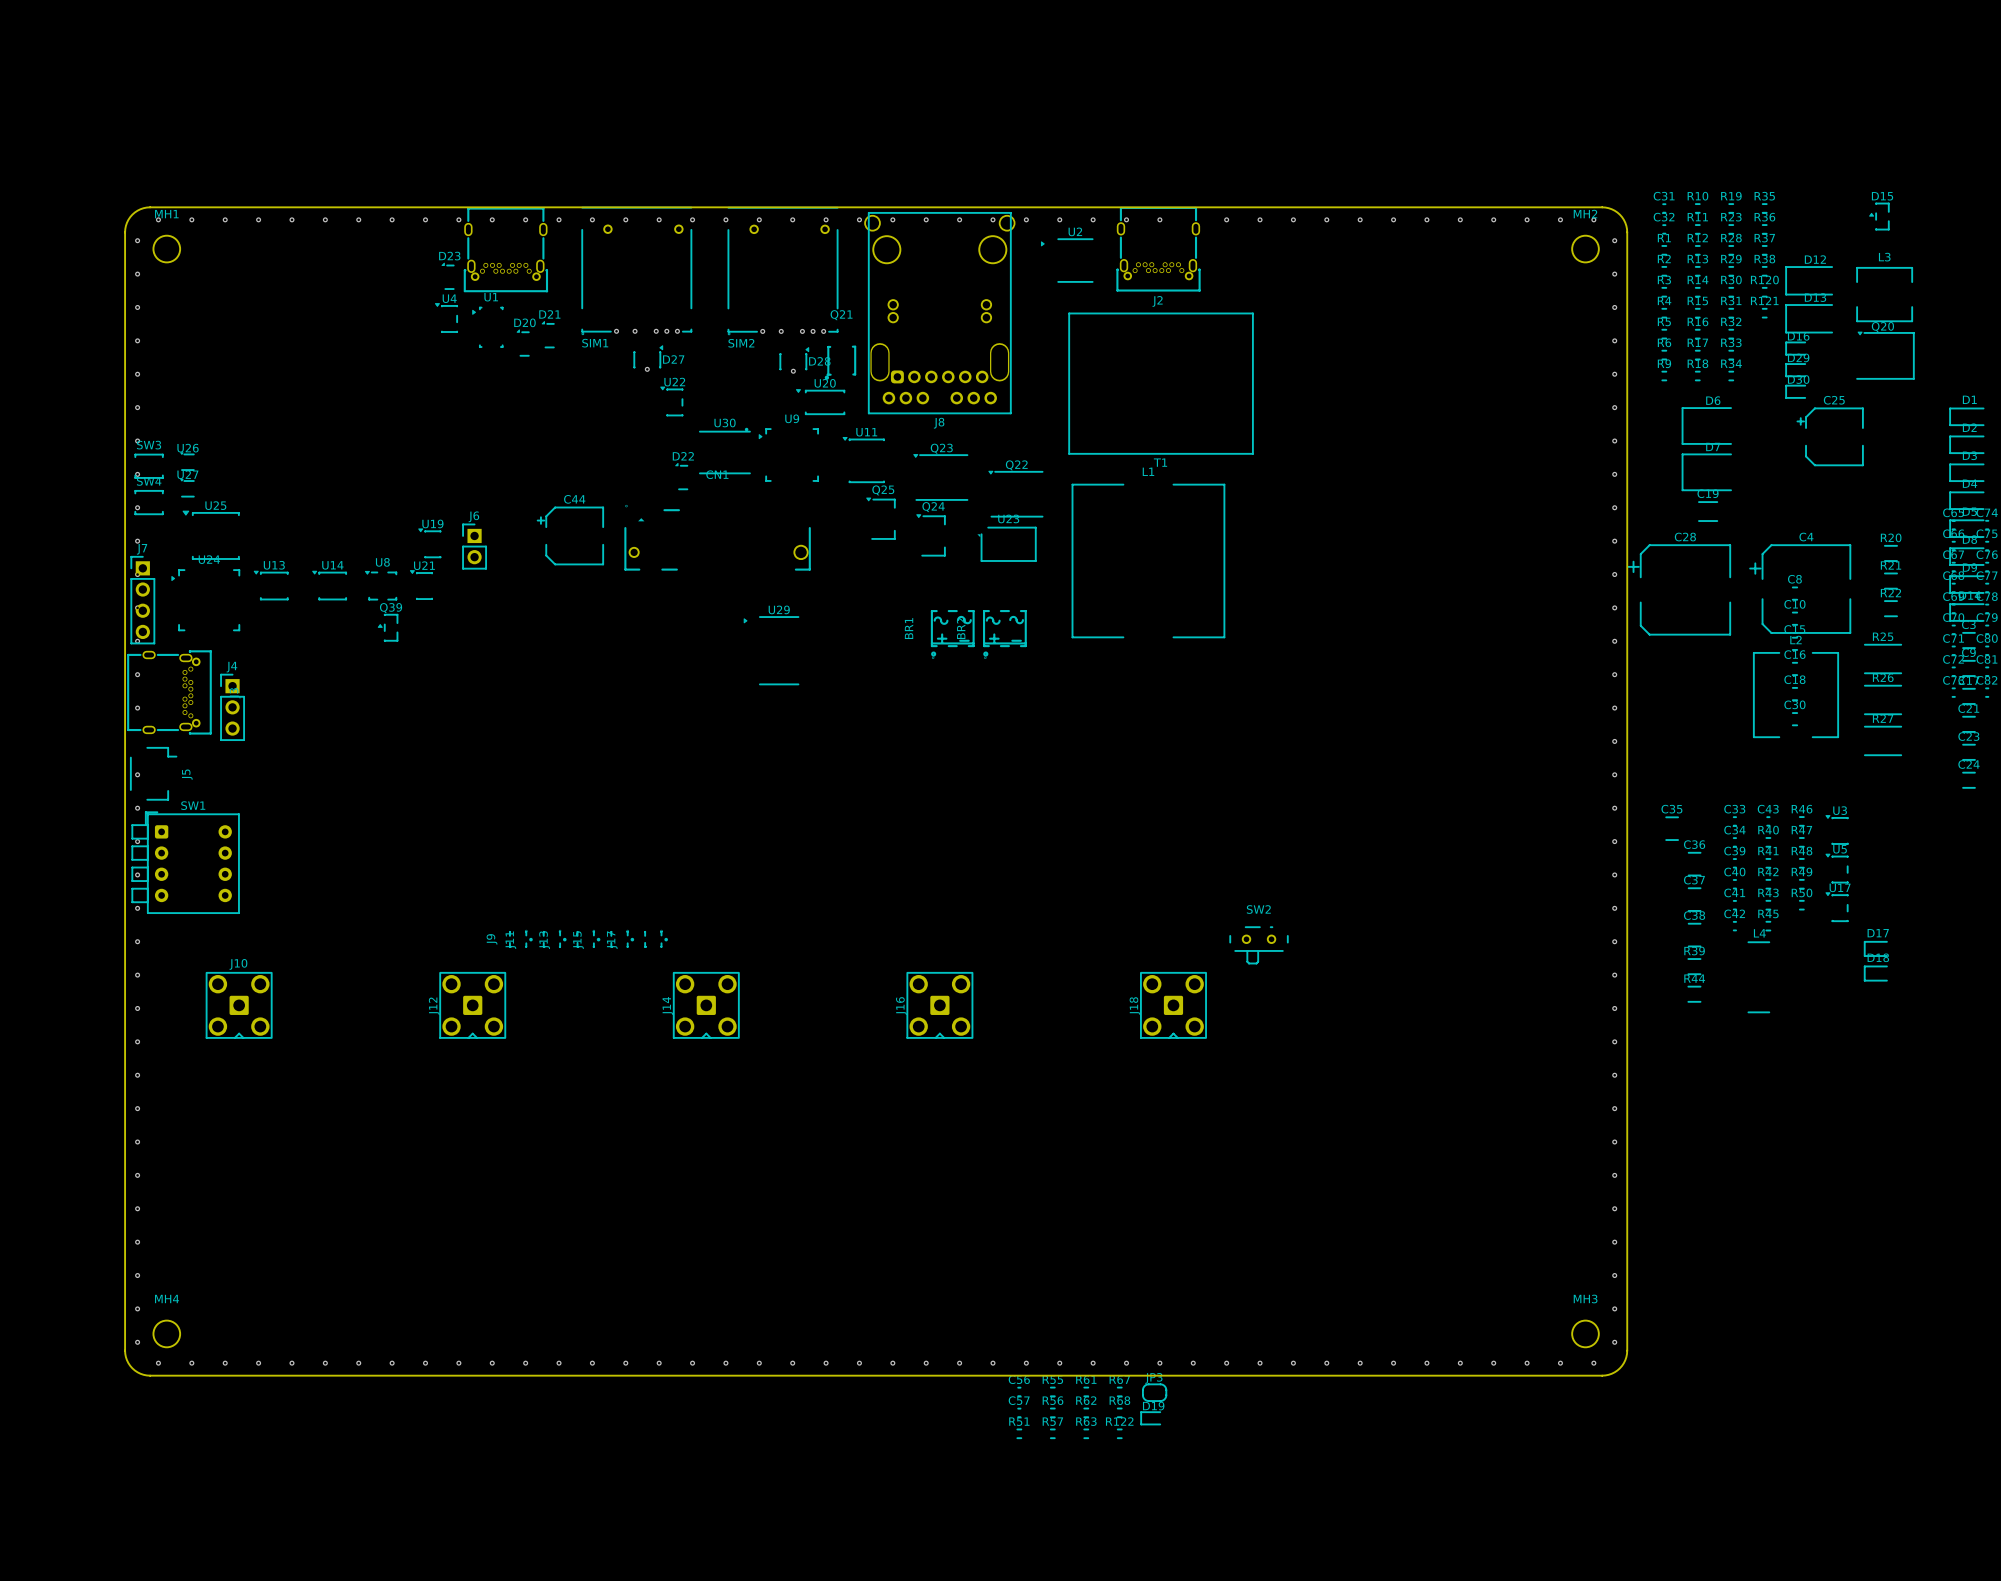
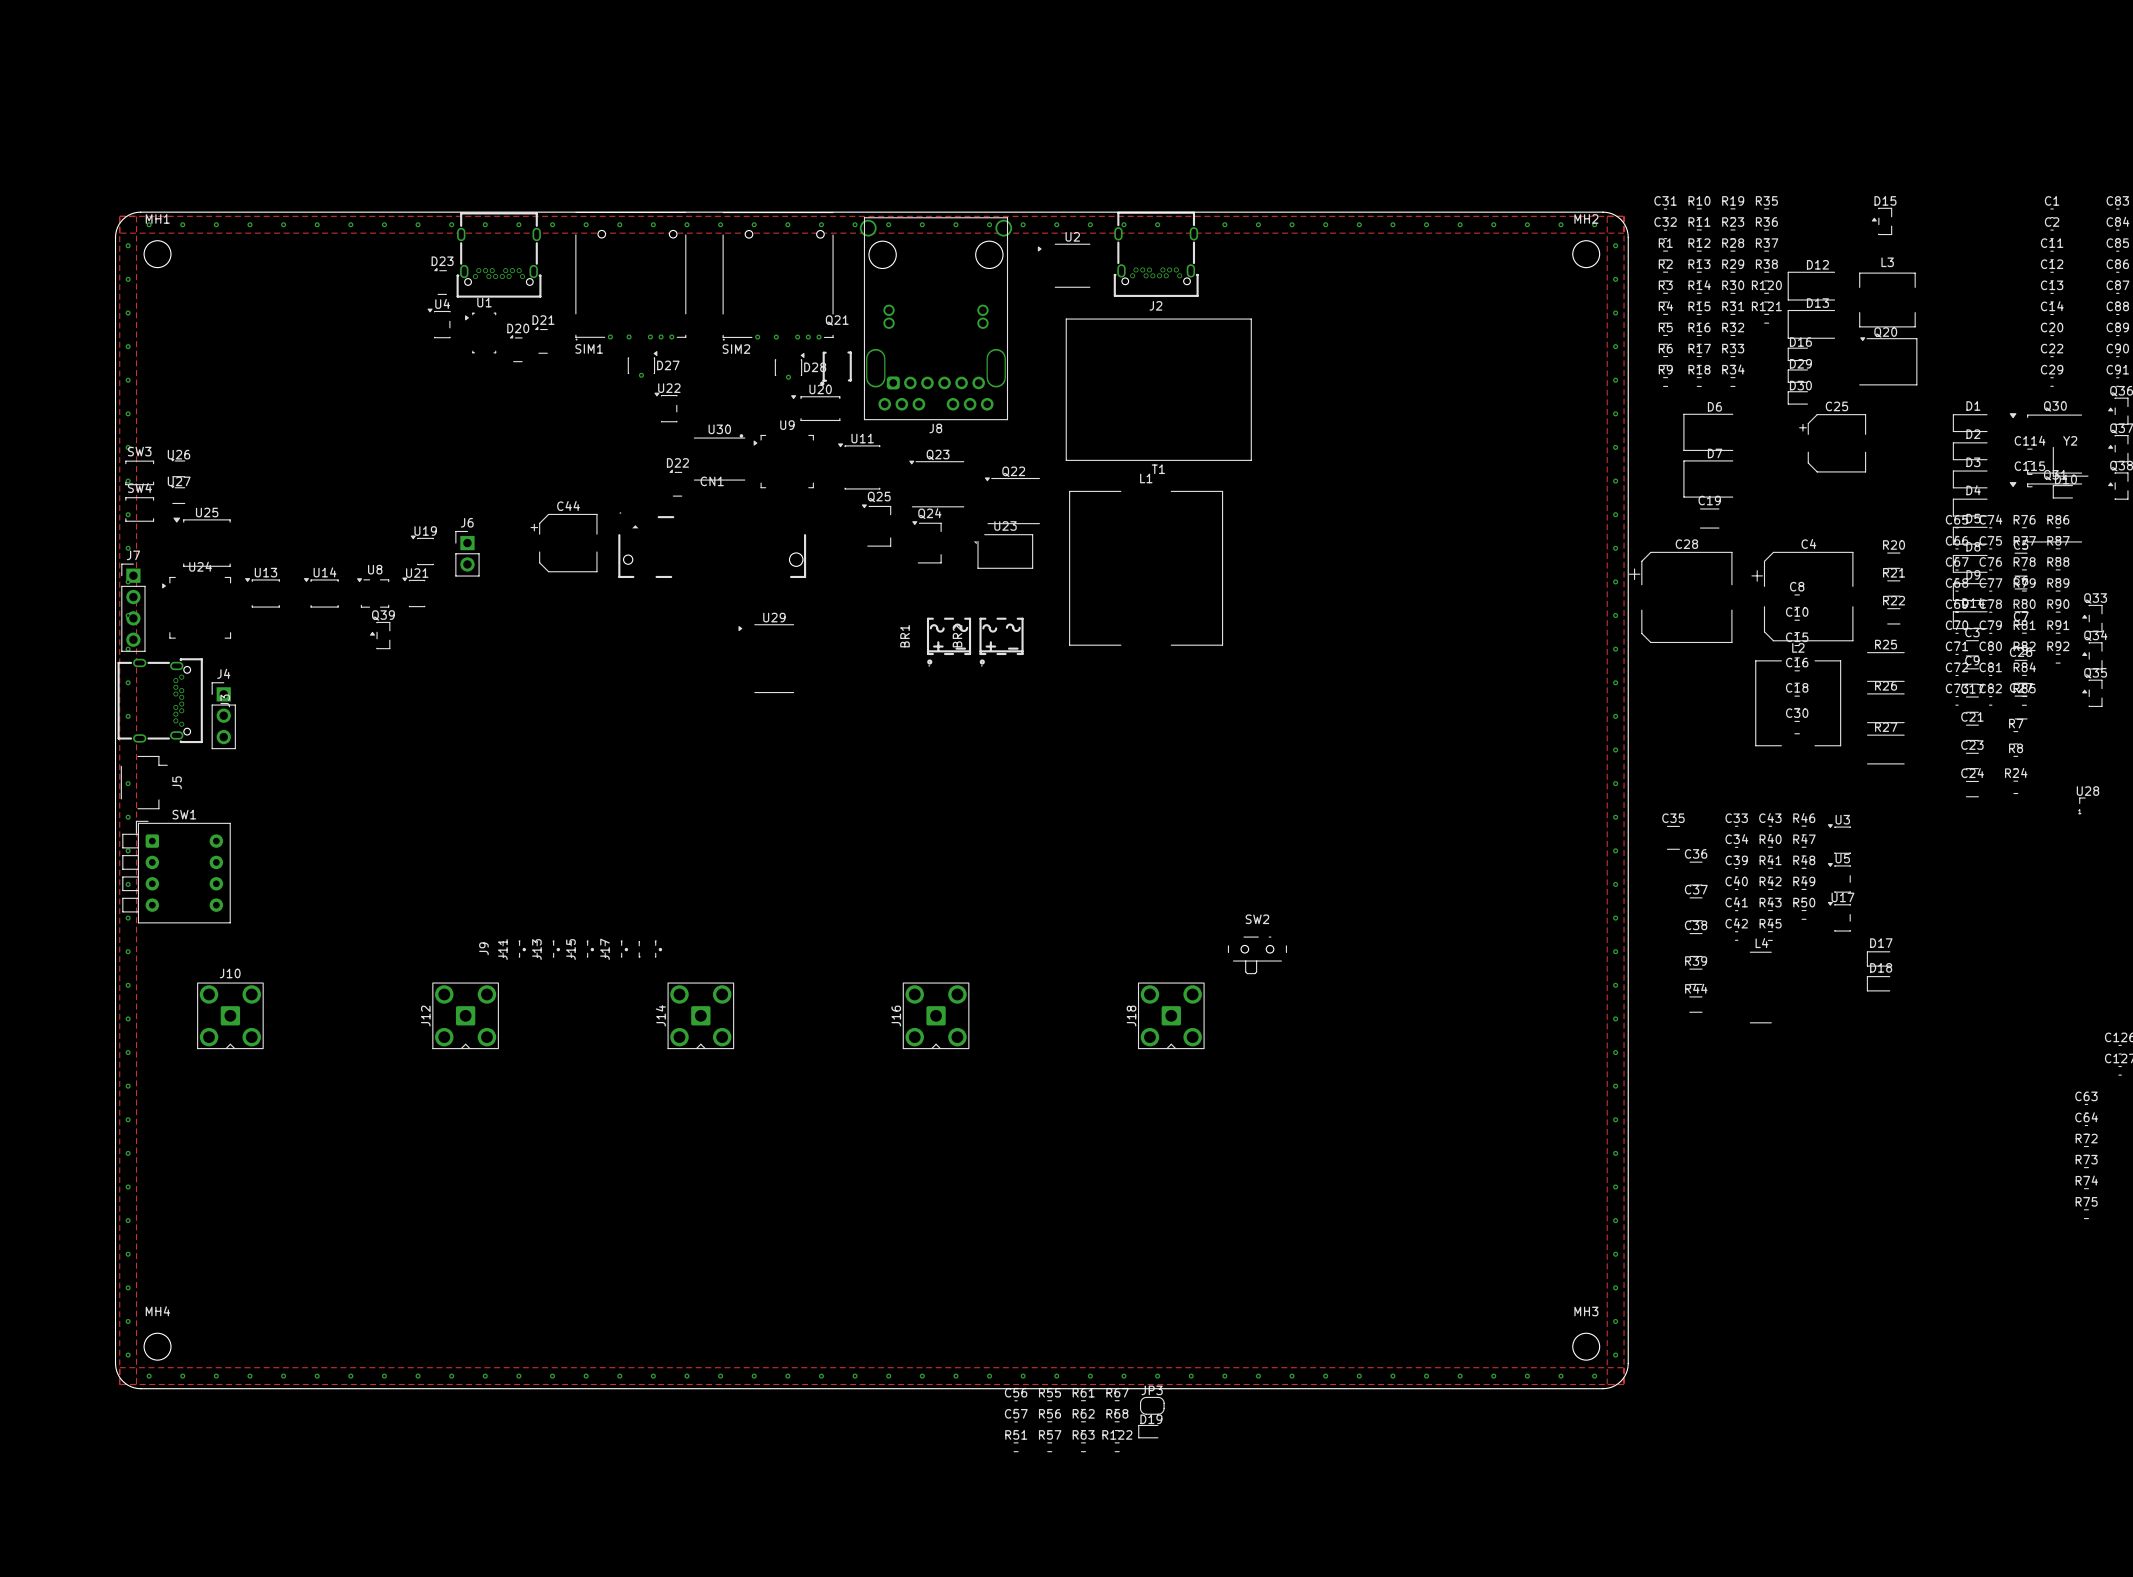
zone outline: none -> (119, 216) (1624, 216) (1624, 1384) (119, 1384) (119, 216)
zone outline: none -> (136, 216) (136, 1384)
zone outline: none -> (1607, 216) (1607, 1384)
zone outline: none -> (119, 233) (1624, 233)
zone outline: none -> (119, 1367) (1624, 1367)

